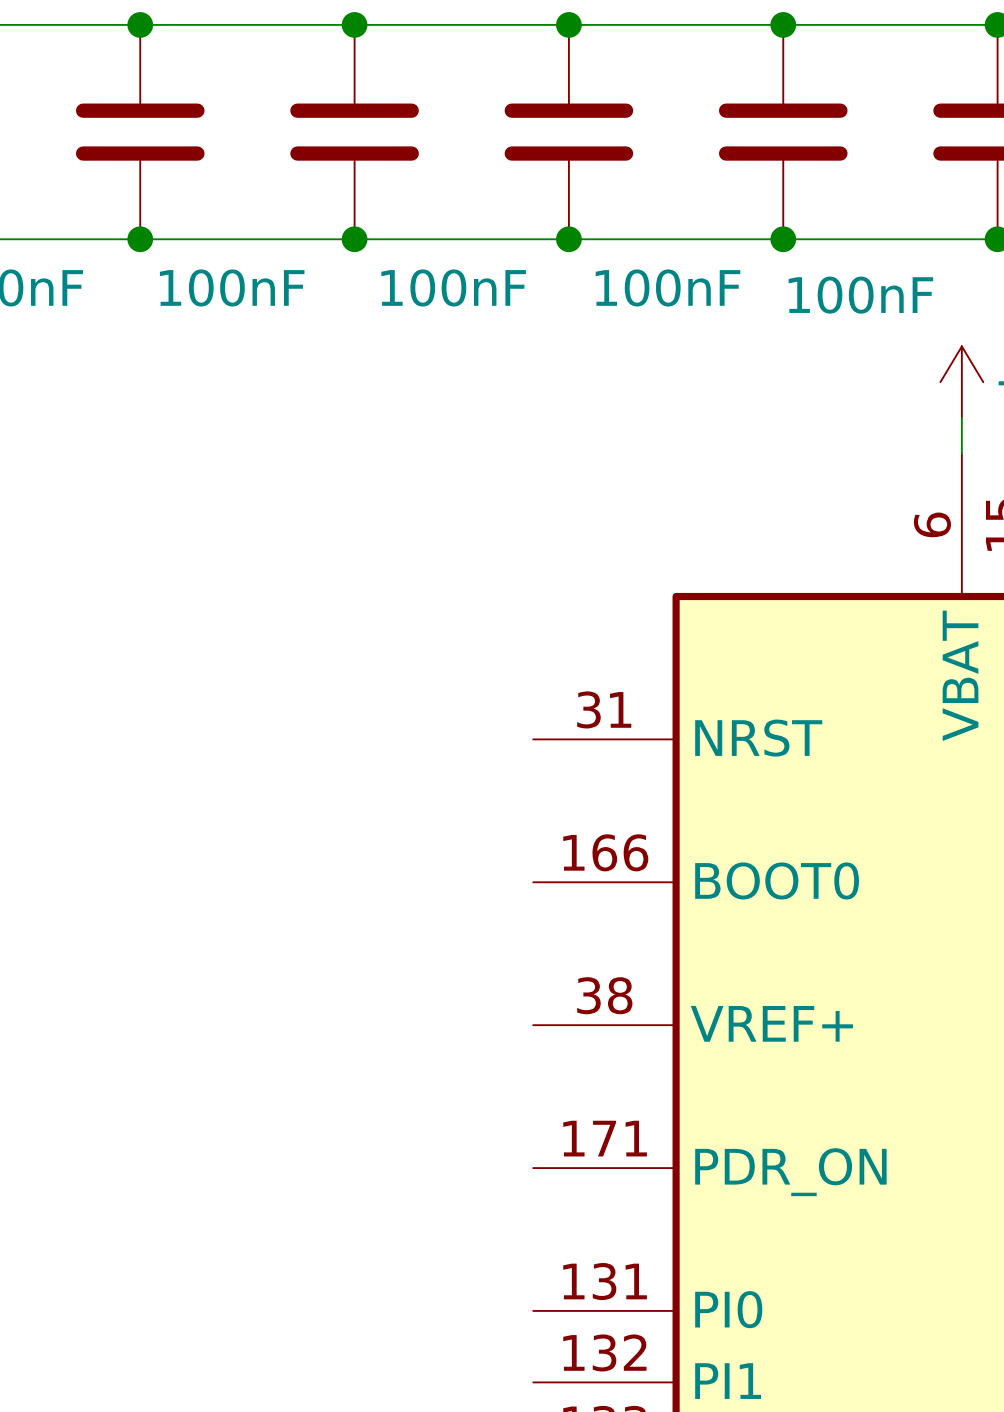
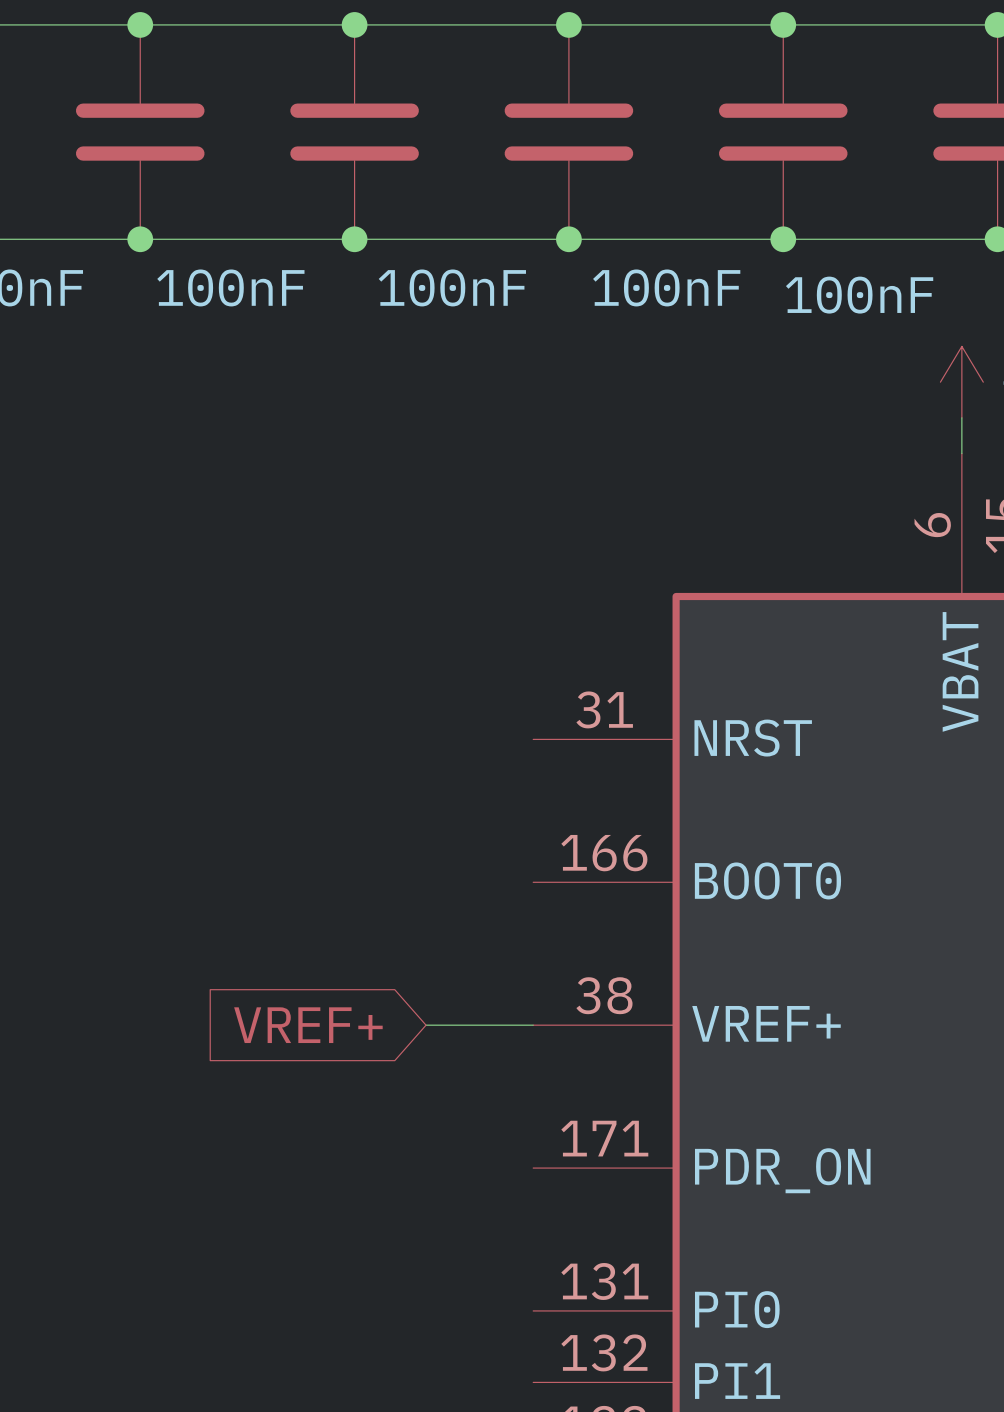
global label: none -> VREF+ (308, 1025)
wire: none -> (426, 1025) (533, 1025)

